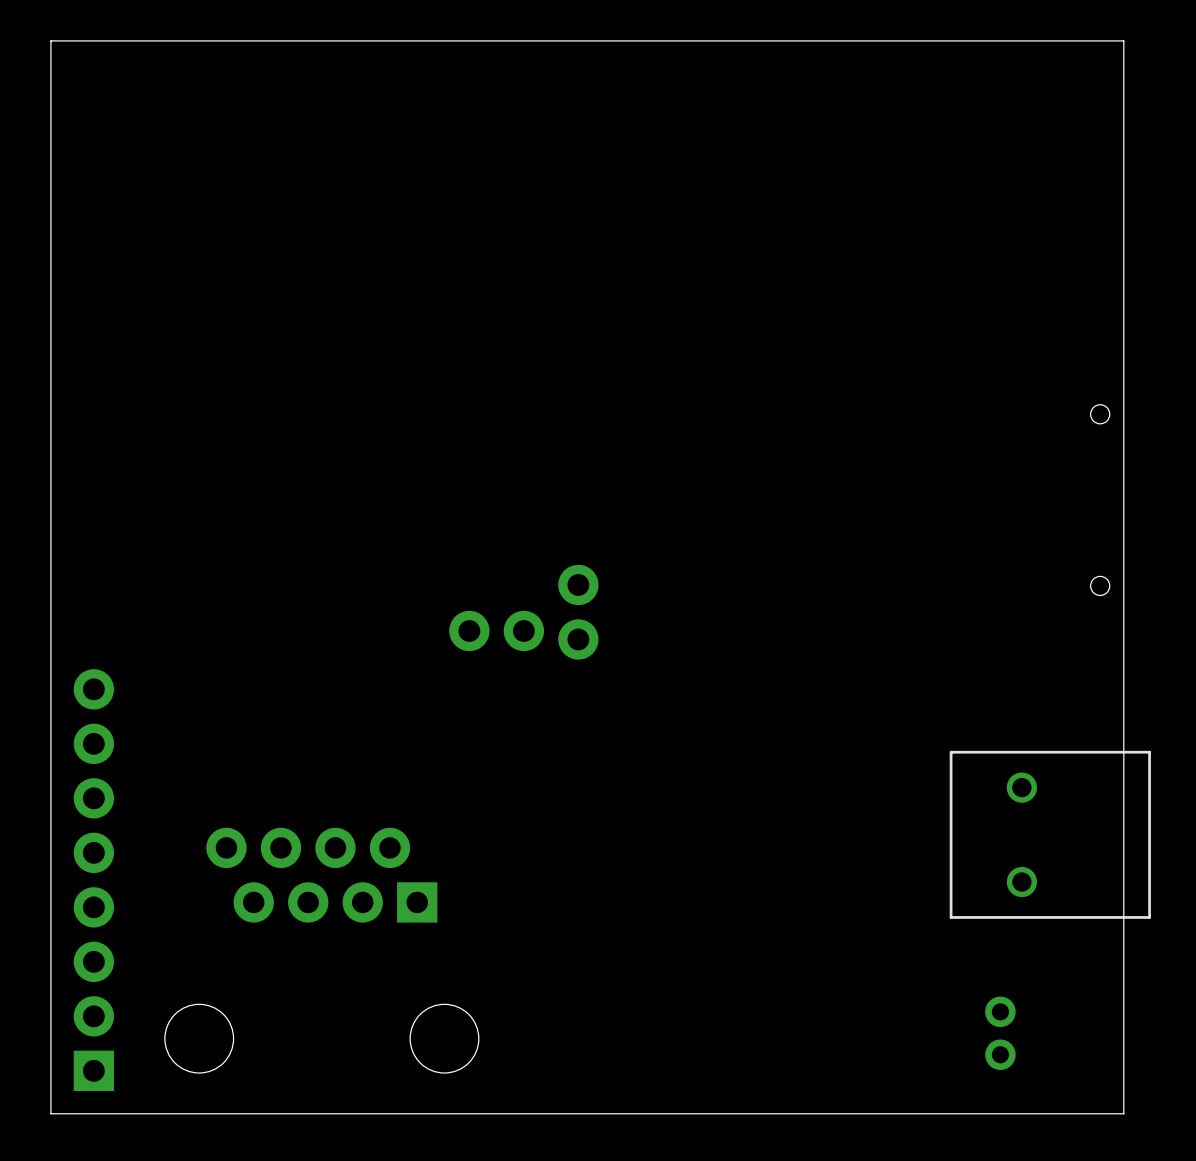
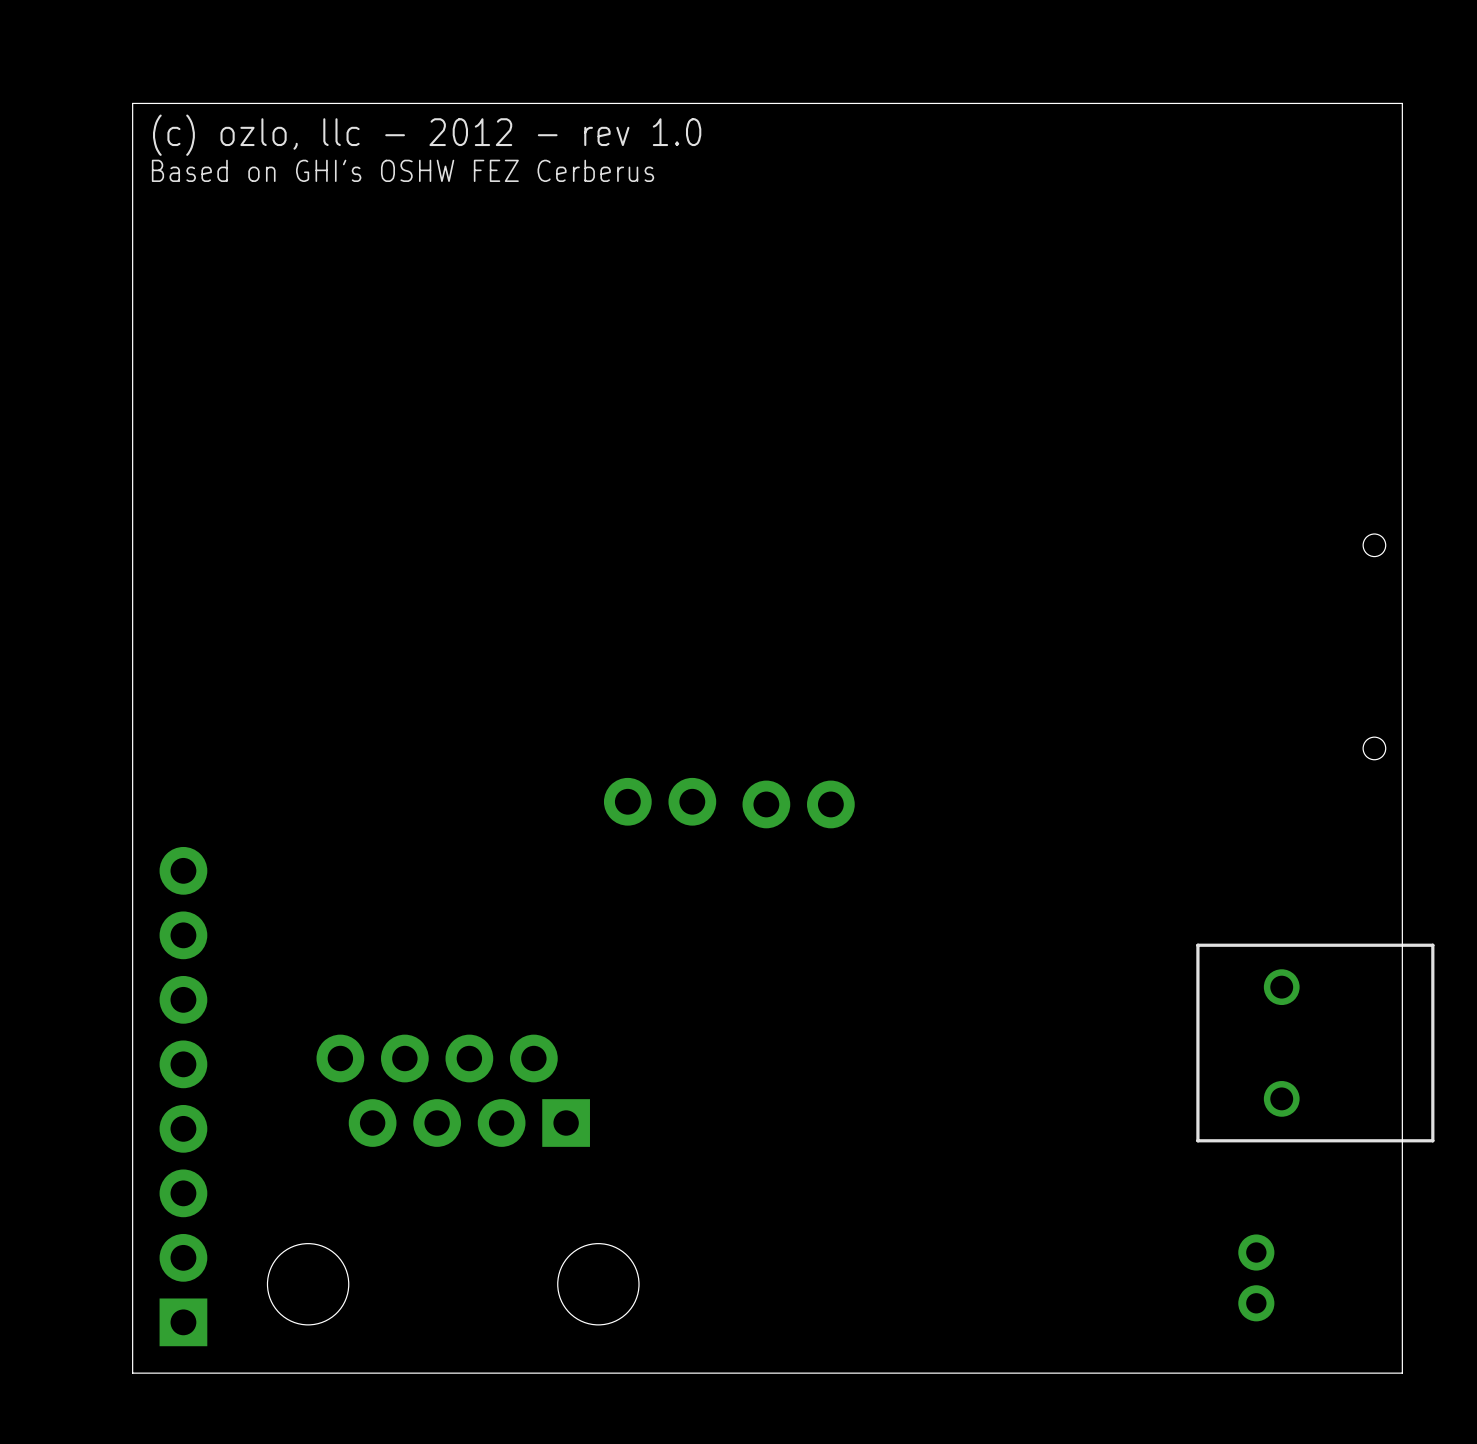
text: none -> (c) ozlo, llc - 2012 - rev 1.0 (427, 135)
text: none -> Based on GHI's OSHW FEZ Cerberus (403, 170)
part rotation: 0° (578, 612) -> 90° clockwise (798, 804)

